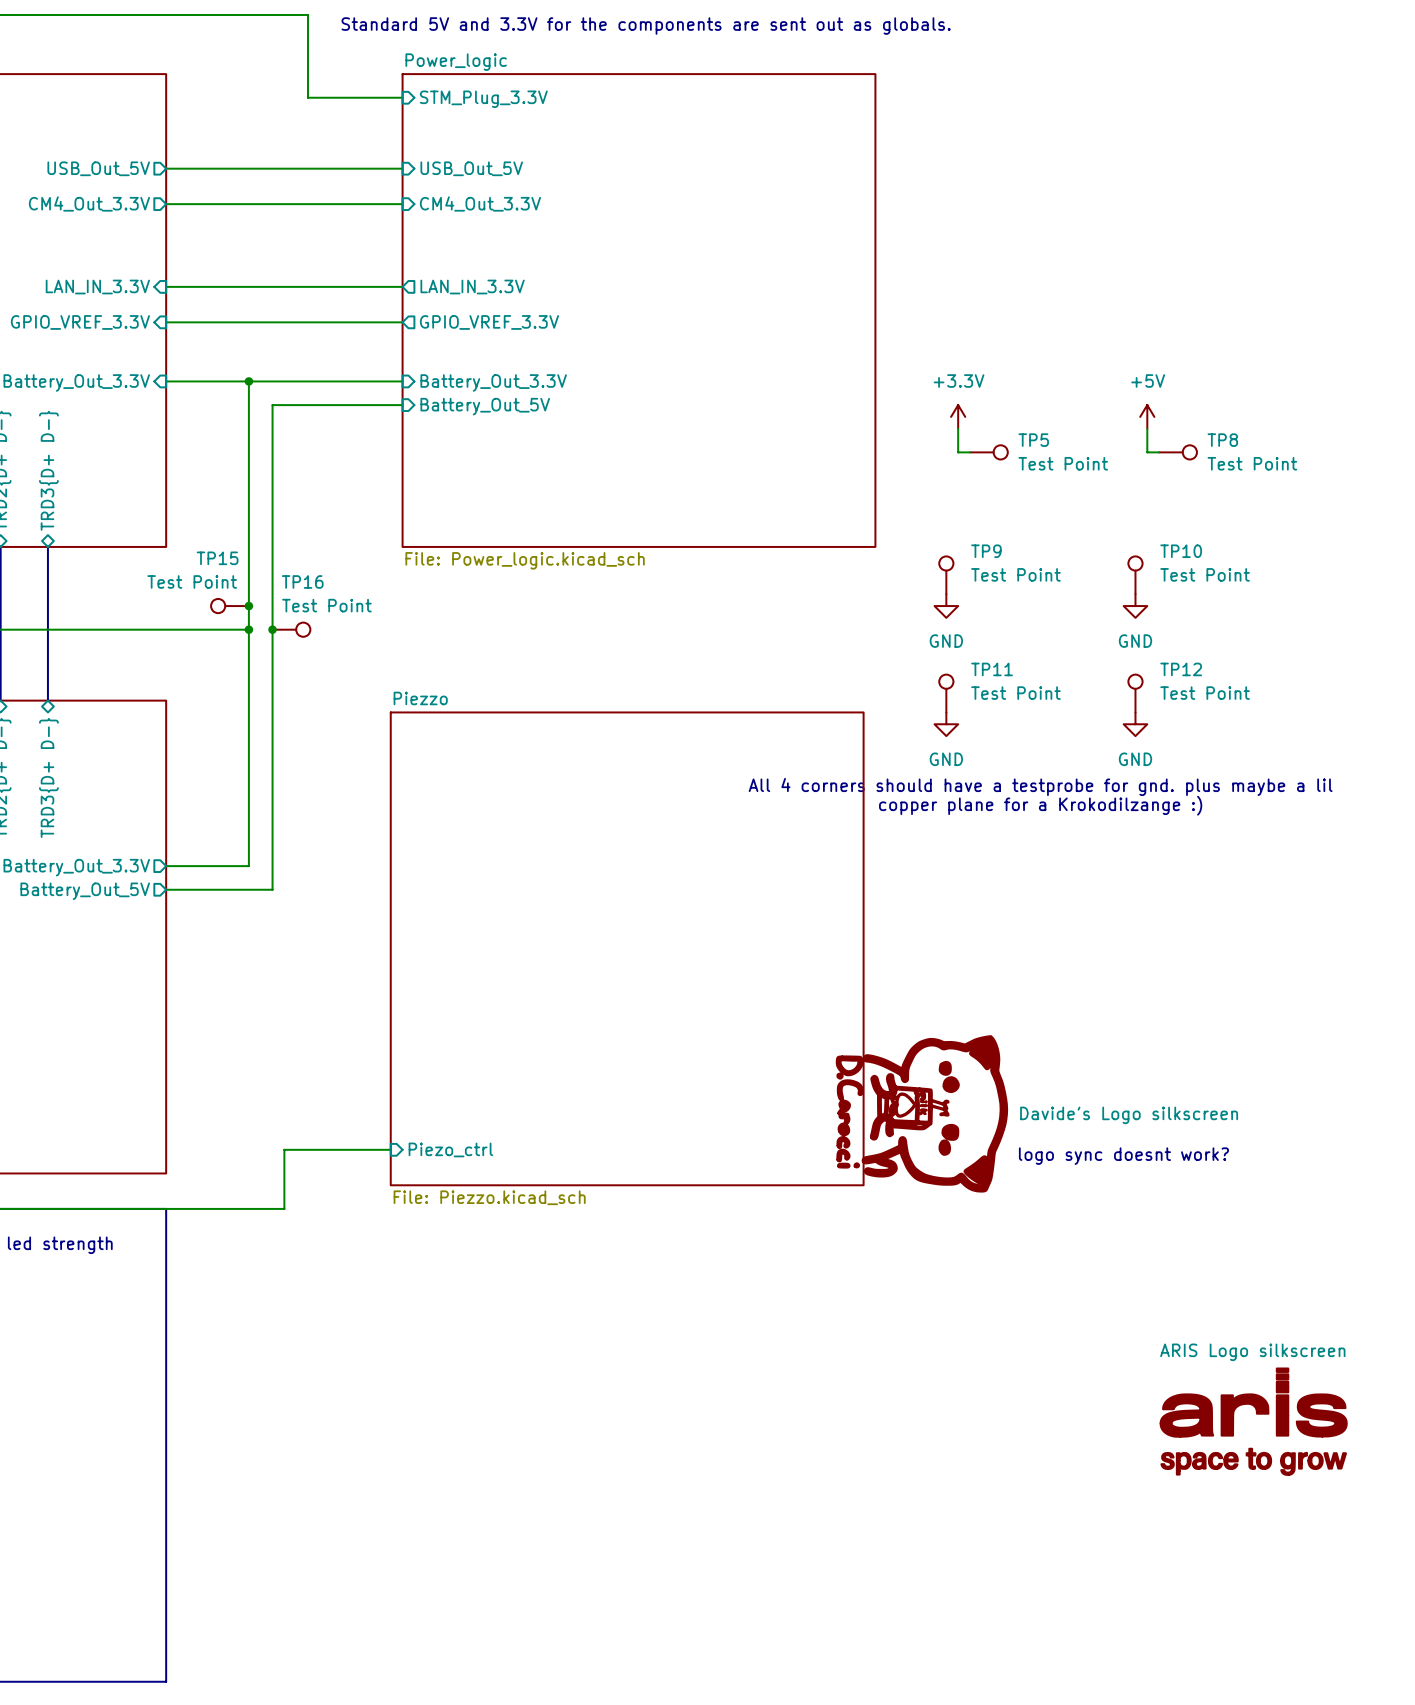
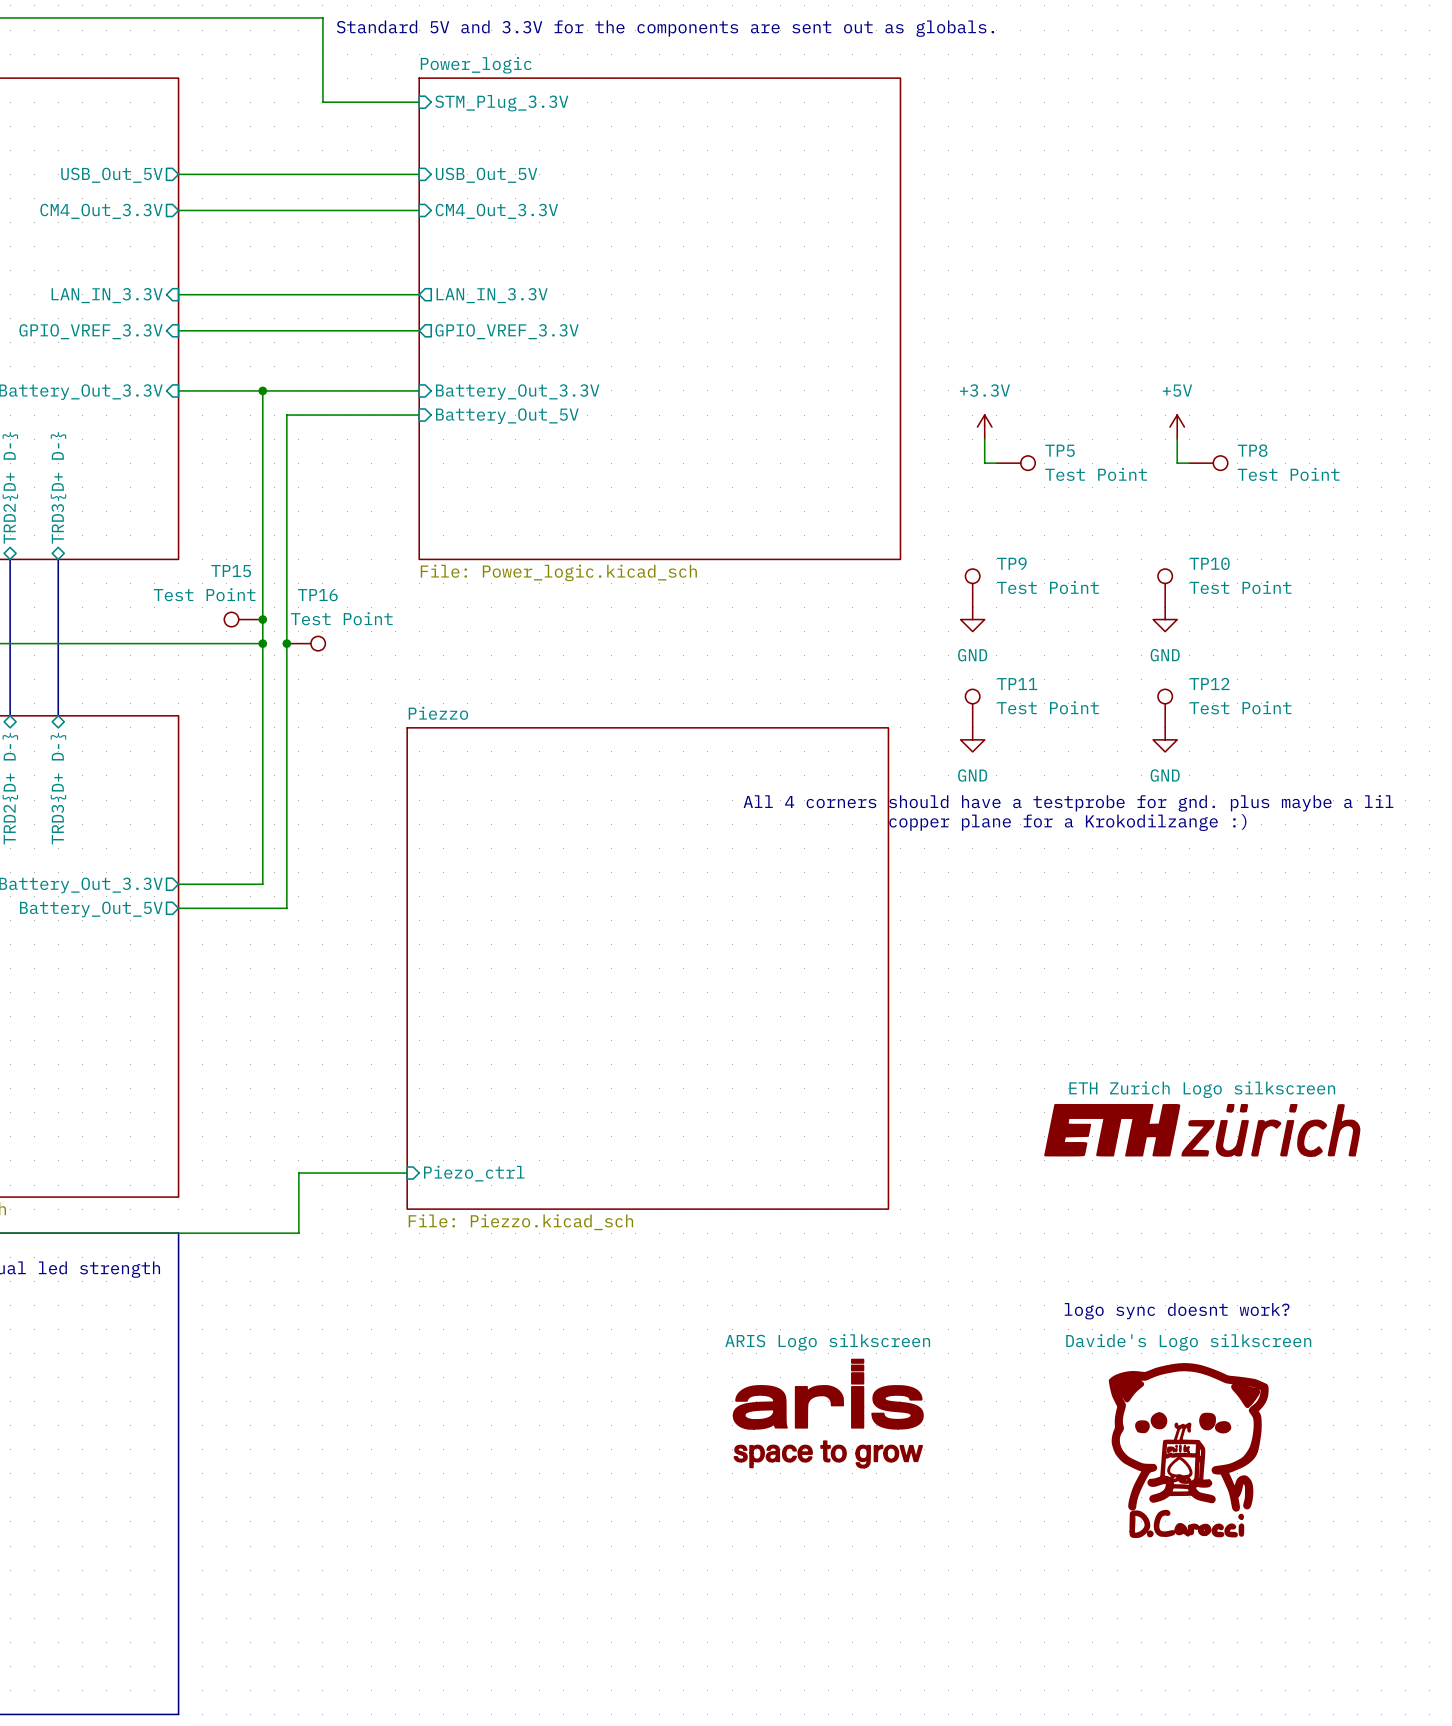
part: none -> ETH Zurich Logo silkscreen (1202, 1130)
power symbol: Davide's Logo silkscreen (921, 1113) -> none
text position: logo sync doesnt work? (1123, 1156) -> logo sync doesnt work? (1177, 1311)
power symbol: none -> ARIS Logo silkscreen (828, 1413)
power symbol: ARIS Logo silkscreen (1253, 1421) -> none
power symbol: none -> Davide's Logo silkscreen (1188, 1450)

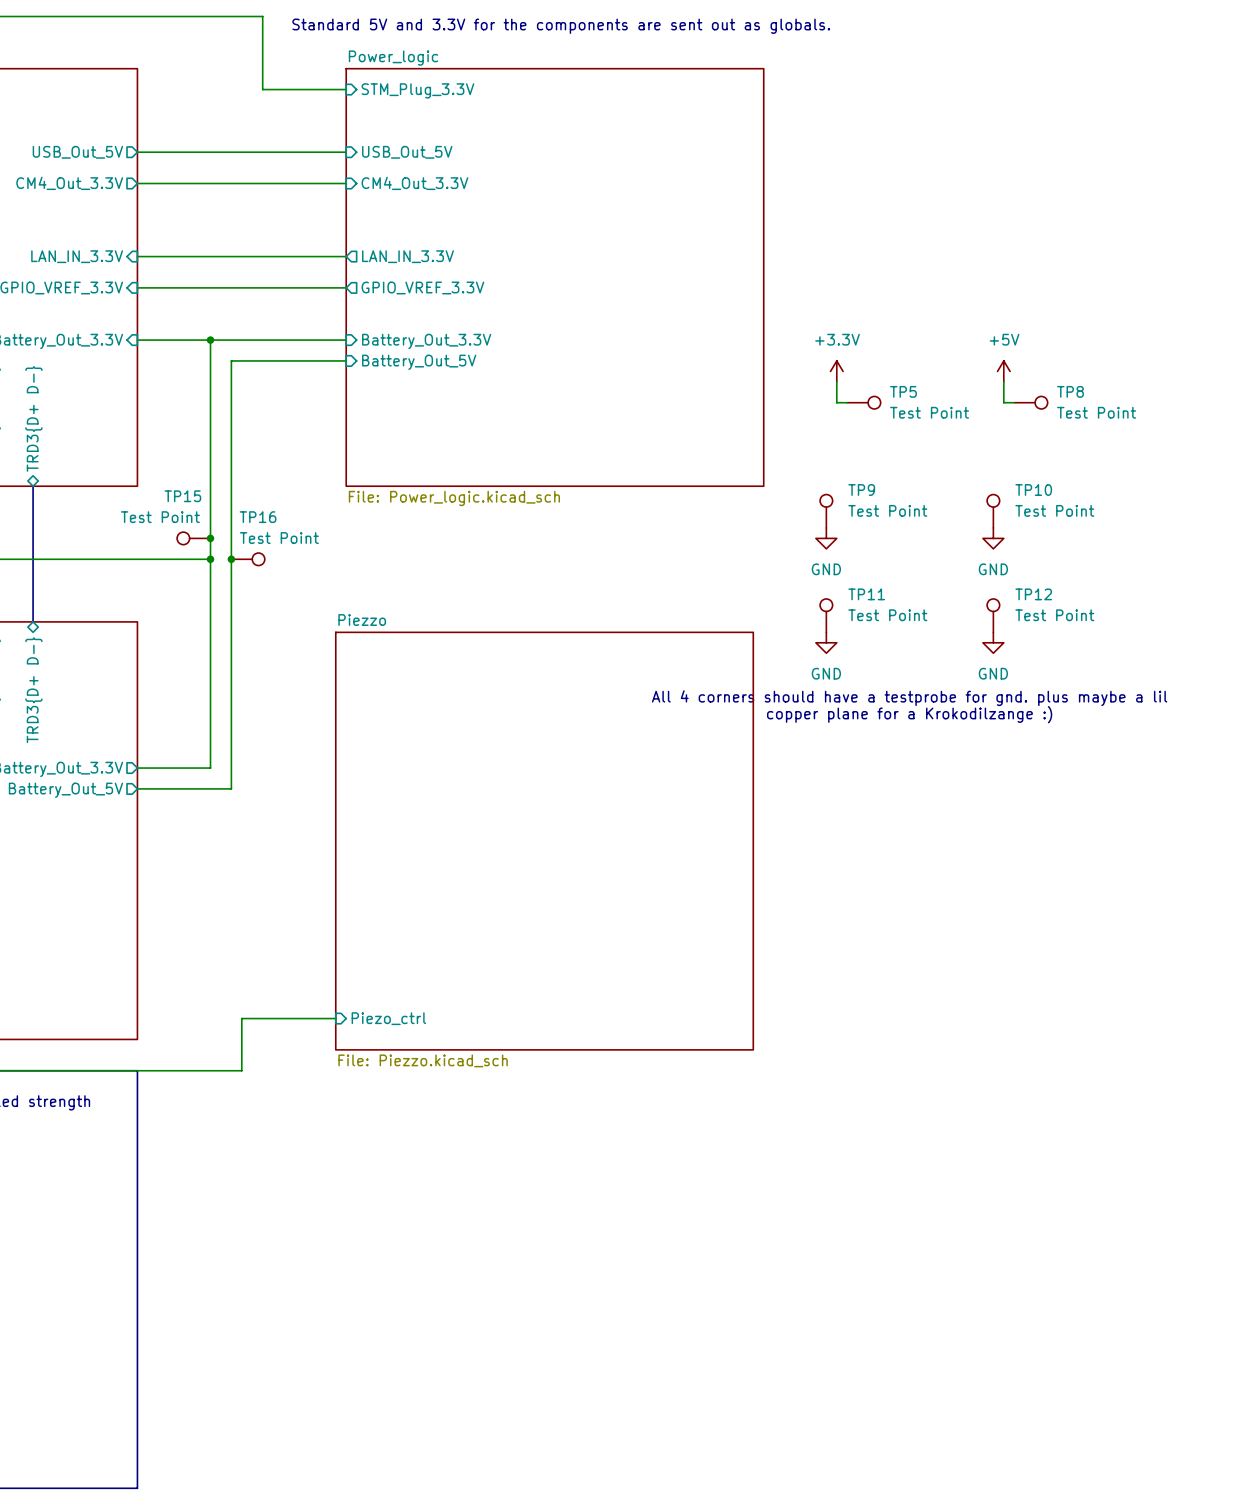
part: ETH Zurich Logo silkscreen (1202, 1130) -> none
text: logo sync doesnt work? (1177, 1311) -> none
power symbol: ARIS Logo silkscreen (828, 1413) -> none
power symbol: Davide's Logo silkscreen (1188, 1450) -> none

